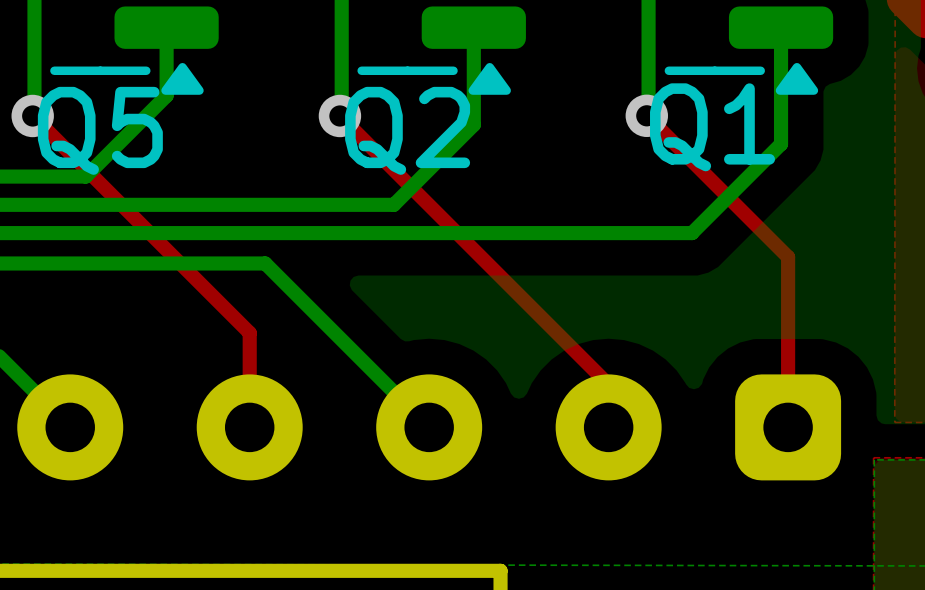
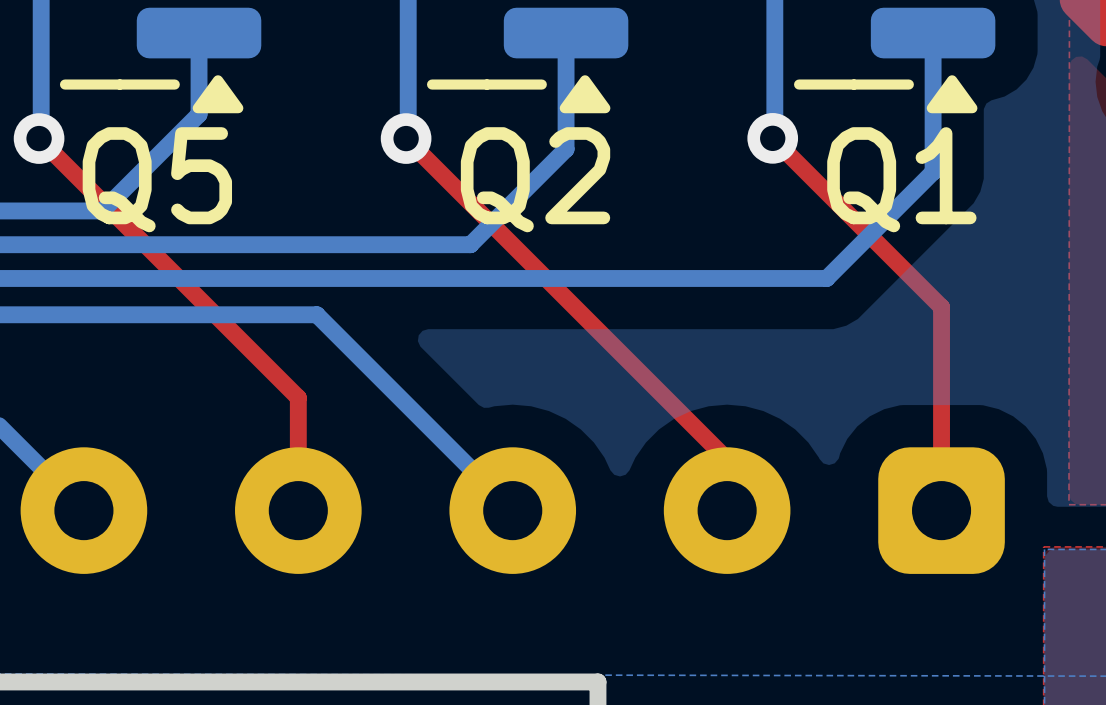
Q1 name position: Q1 (712, 127) -> Q1 (901, 179)
Q5 name position: Q5 (100, 130) -> Q5 (157, 179)
Q2 name position: Q2 (407, 130) -> Q2 (535, 179)

